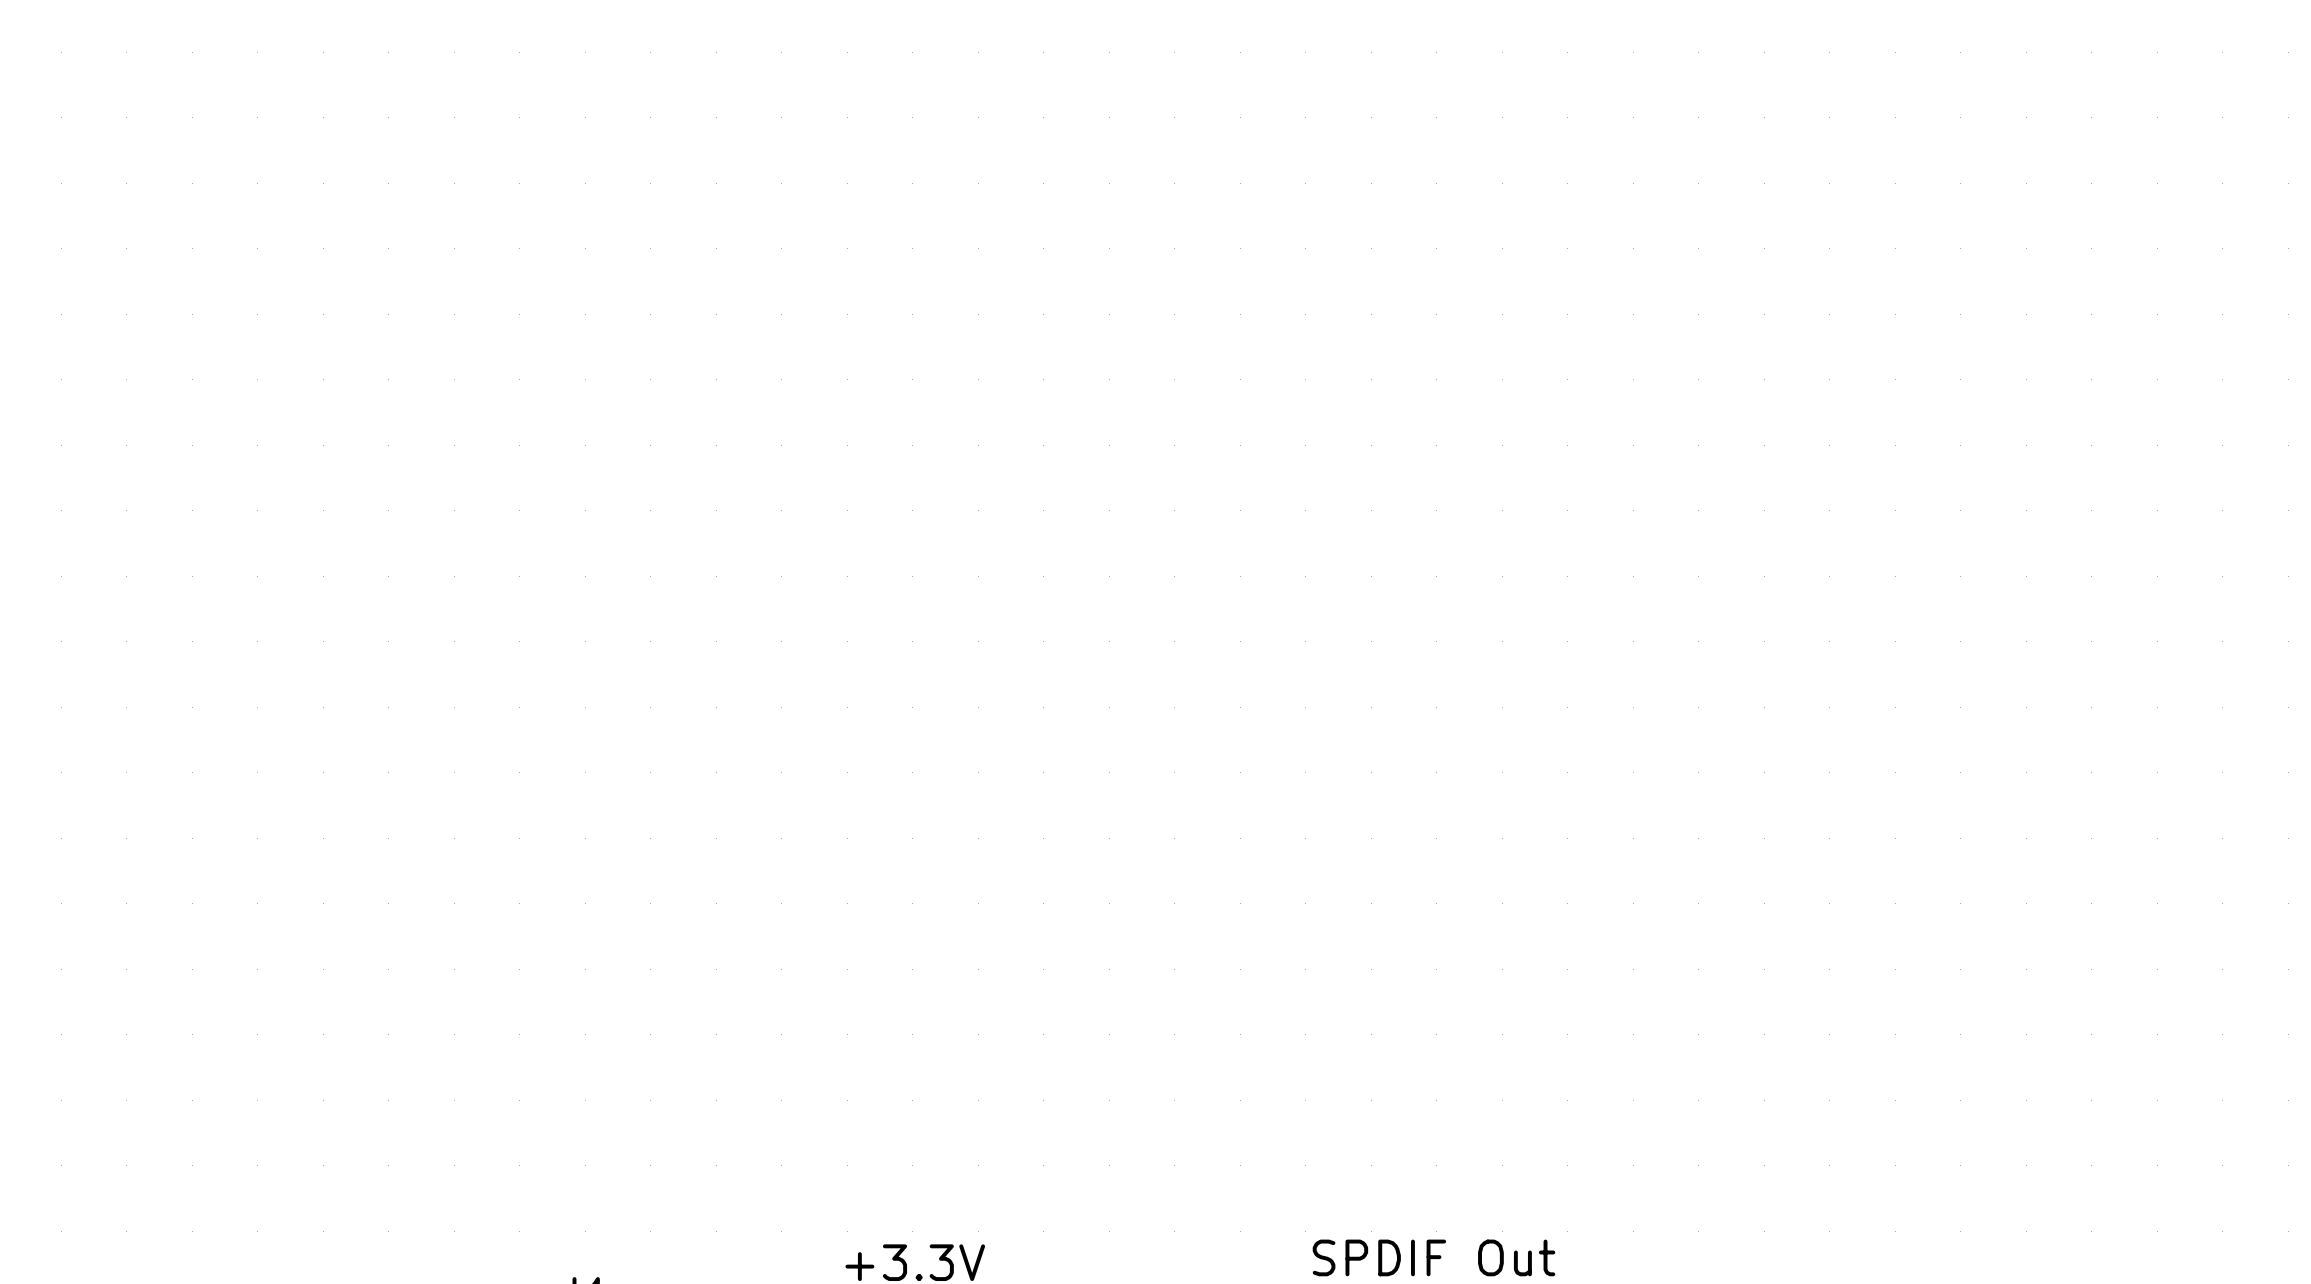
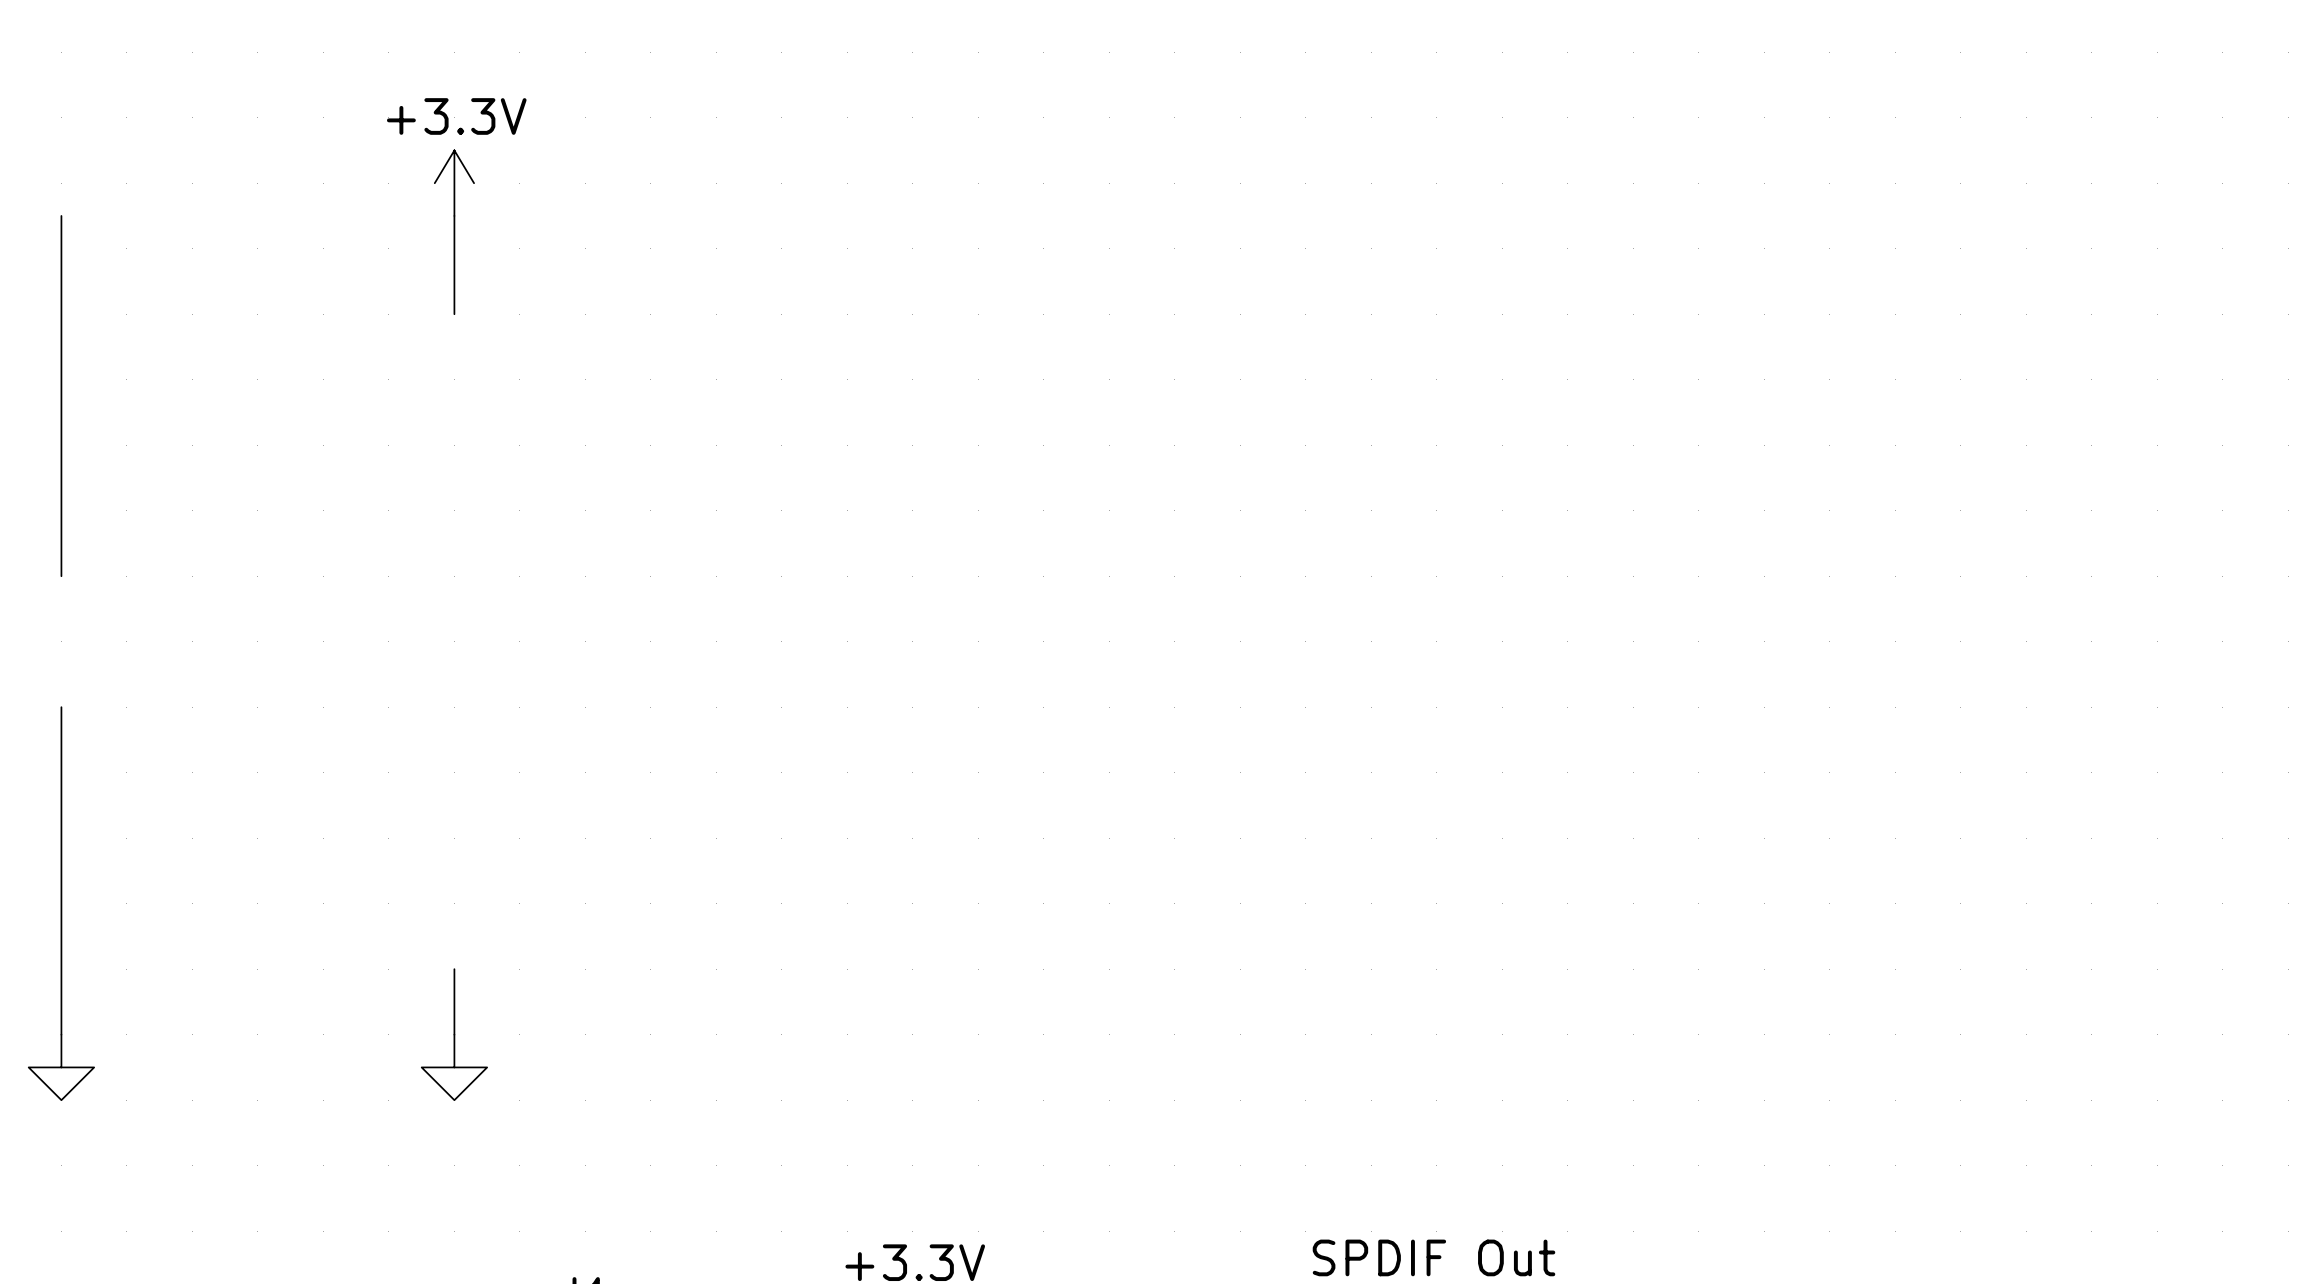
power symbol: none -> +3.3V (454, 183)
wire: none -> (61, 215) (61, 576)
wire: none -> (454, 215) (454, 314)
wire: none -> (61, 707) (61, 1034)
wire: none -> (454, 969) (454, 1034)
power symbol: none -> (61, 1067)
power symbol: none -> (454, 1067)

